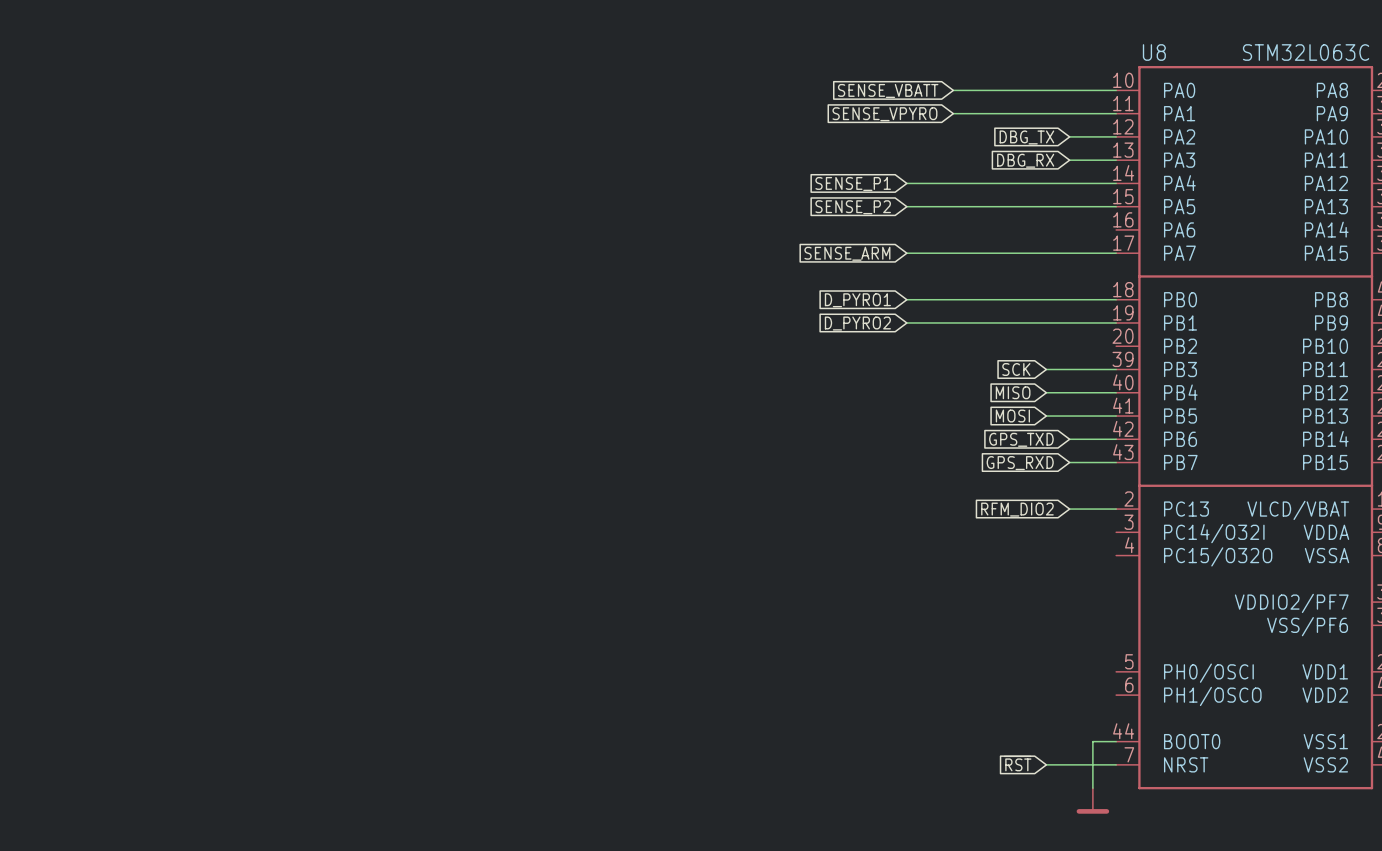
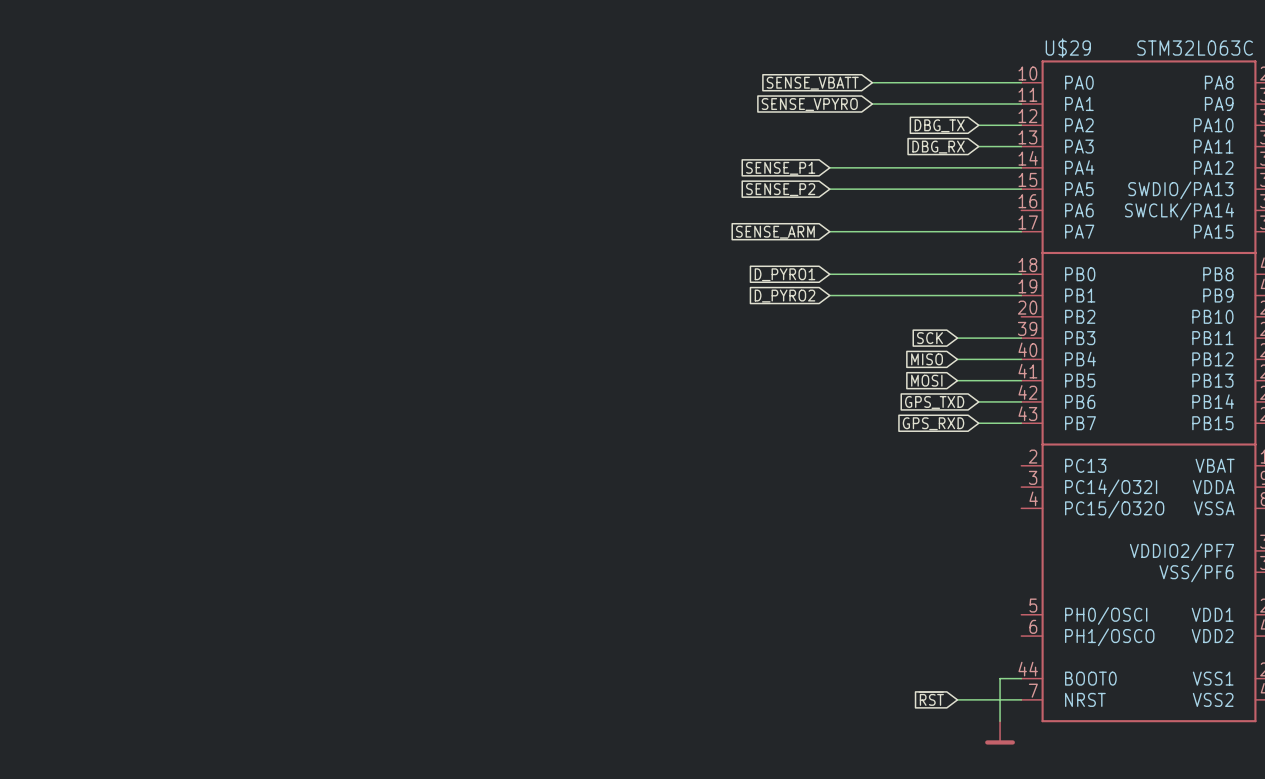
U8 name: U8 (1154, 52) -> U$29 (1068, 48)
U8 pin name: PA13 (1326, 206) -> SWDIO/PA13 (1180, 190)
U8 pin name: PA14 (1326, 229) -> SWCLK/PA14 (1179, 211)
global label: RFM_DIO2 (1017, 509) -> none
wire: (1069, 509) (1116, 509) -> none
U8 pin name: VLCD/VBAT (1298, 510) -> VBAT (1215, 465)

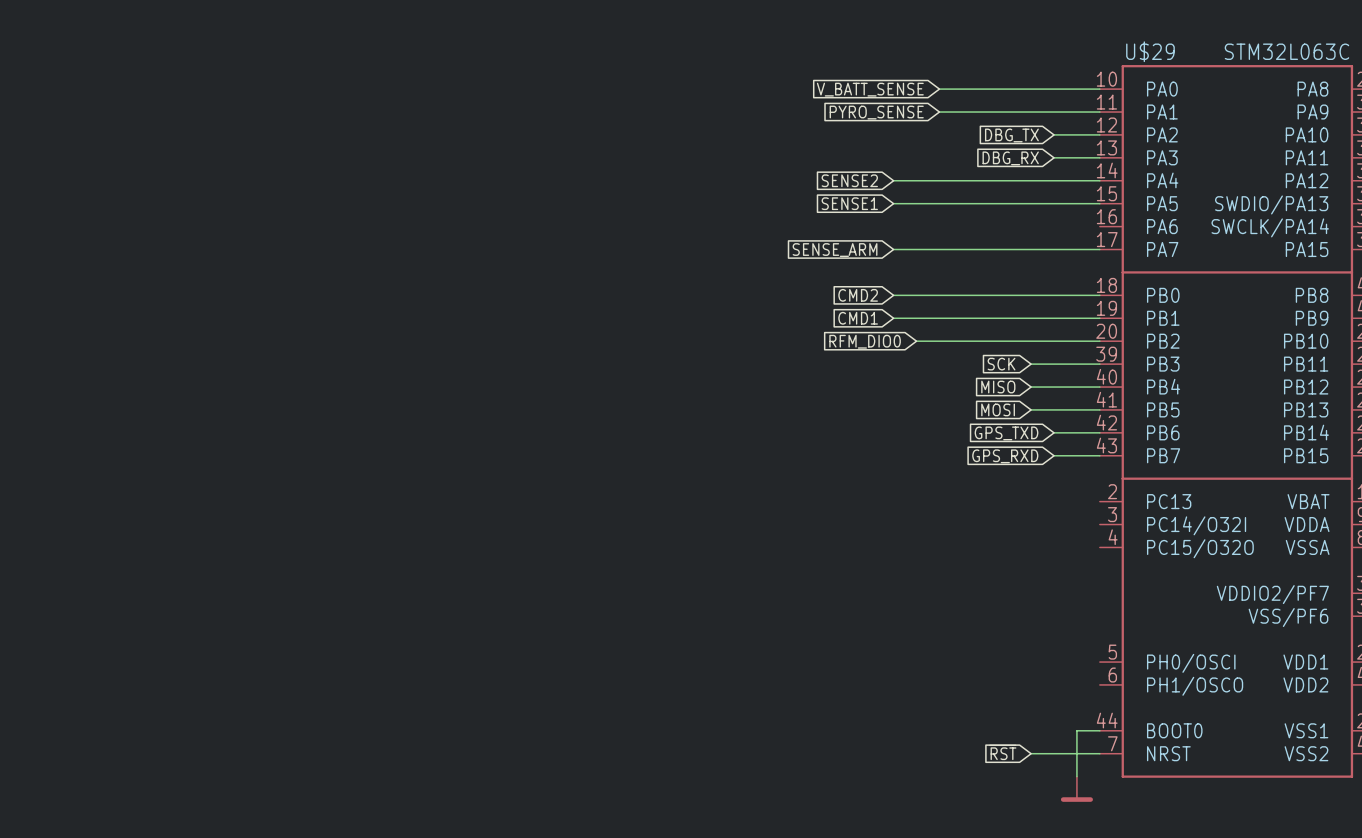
global label: SENSE_VBATT (812, 83) -> V_BATT_SENSE (870, 89)
global label: SENSE_VPYRO (809, 104) -> PYRO_SENSE (876, 112)
global label: SENSE_P1 (780, 168) -> SENSE2 (849, 180)
global label: SENSE_P2 (780, 189) -> SENSE1 (849, 203)
global label: D_PYRO1 (784, 274) -> CMD2 (858, 295)
global label: D_PYRO2 (784, 296) -> CMD1 (858, 318)
wire: none -> (916, 341) (1099, 341)
global label: none -> RFM_DIO0 (865, 341)

